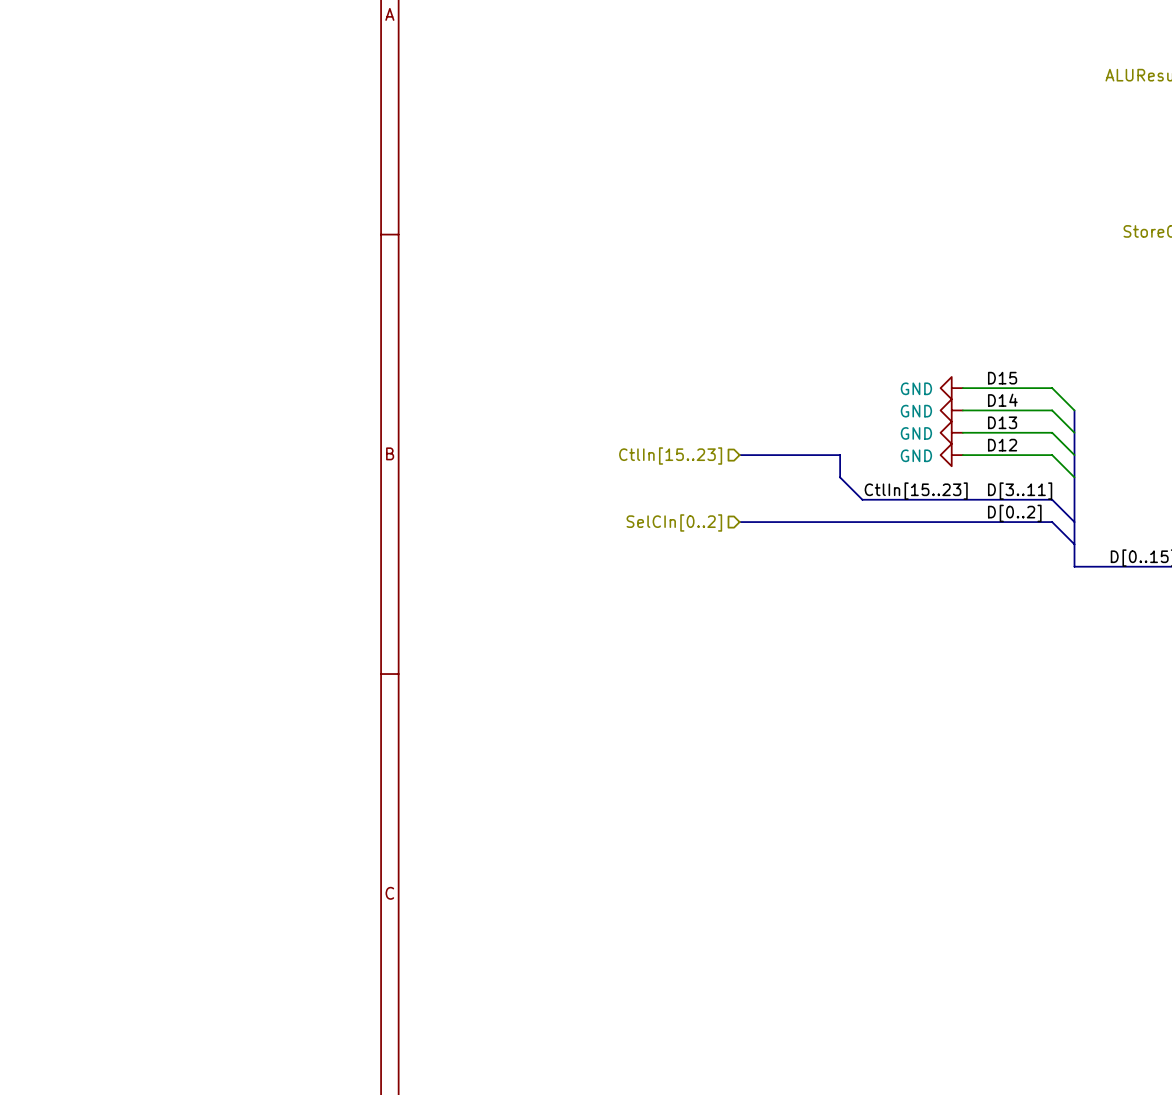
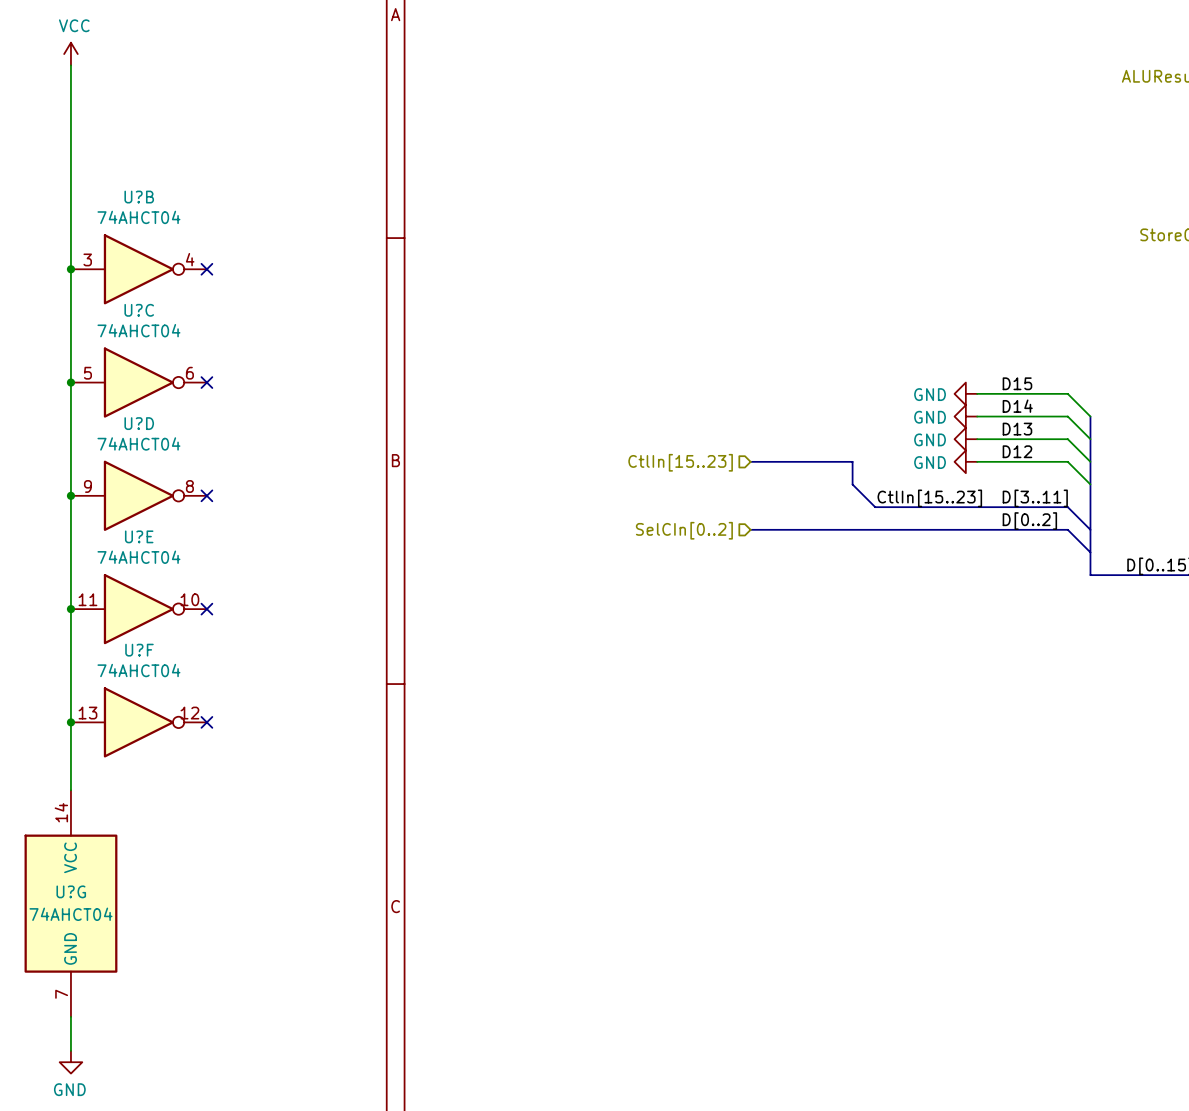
power symbol: none -> VCC (70, 54)
wire: none -> (70, 65) (70, 790)
junction: none -> (70, 269)
U?B: none -> 74AHCT04 (138, 269)
no-connect mark: none -> (206, 269)
junction: none -> (70, 382)
U?C: none -> 74AHCT04 (138, 382)
no-connect mark: none -> (206, 382)
junction: none -> (70, 495)
U?D: none -> 74AHCT04 (138, 495)
no-connect mark: none -> (206, 495)
junction: none -> (70, 609)
U?E: none -> 74AHCT04 (138, 609)
no-connect mark: none -> (206, 609)
junction: none -> (70, 722)
U?F: none -> 74AHCT04 (138, 722)
no-connect mark: none -> (206, 722)
U?G: none -> 74AHCT04 (70, 903)
wire: none -> (70, 1016) (70, 1050)
power symbol: none -> GND (70, 1062)

